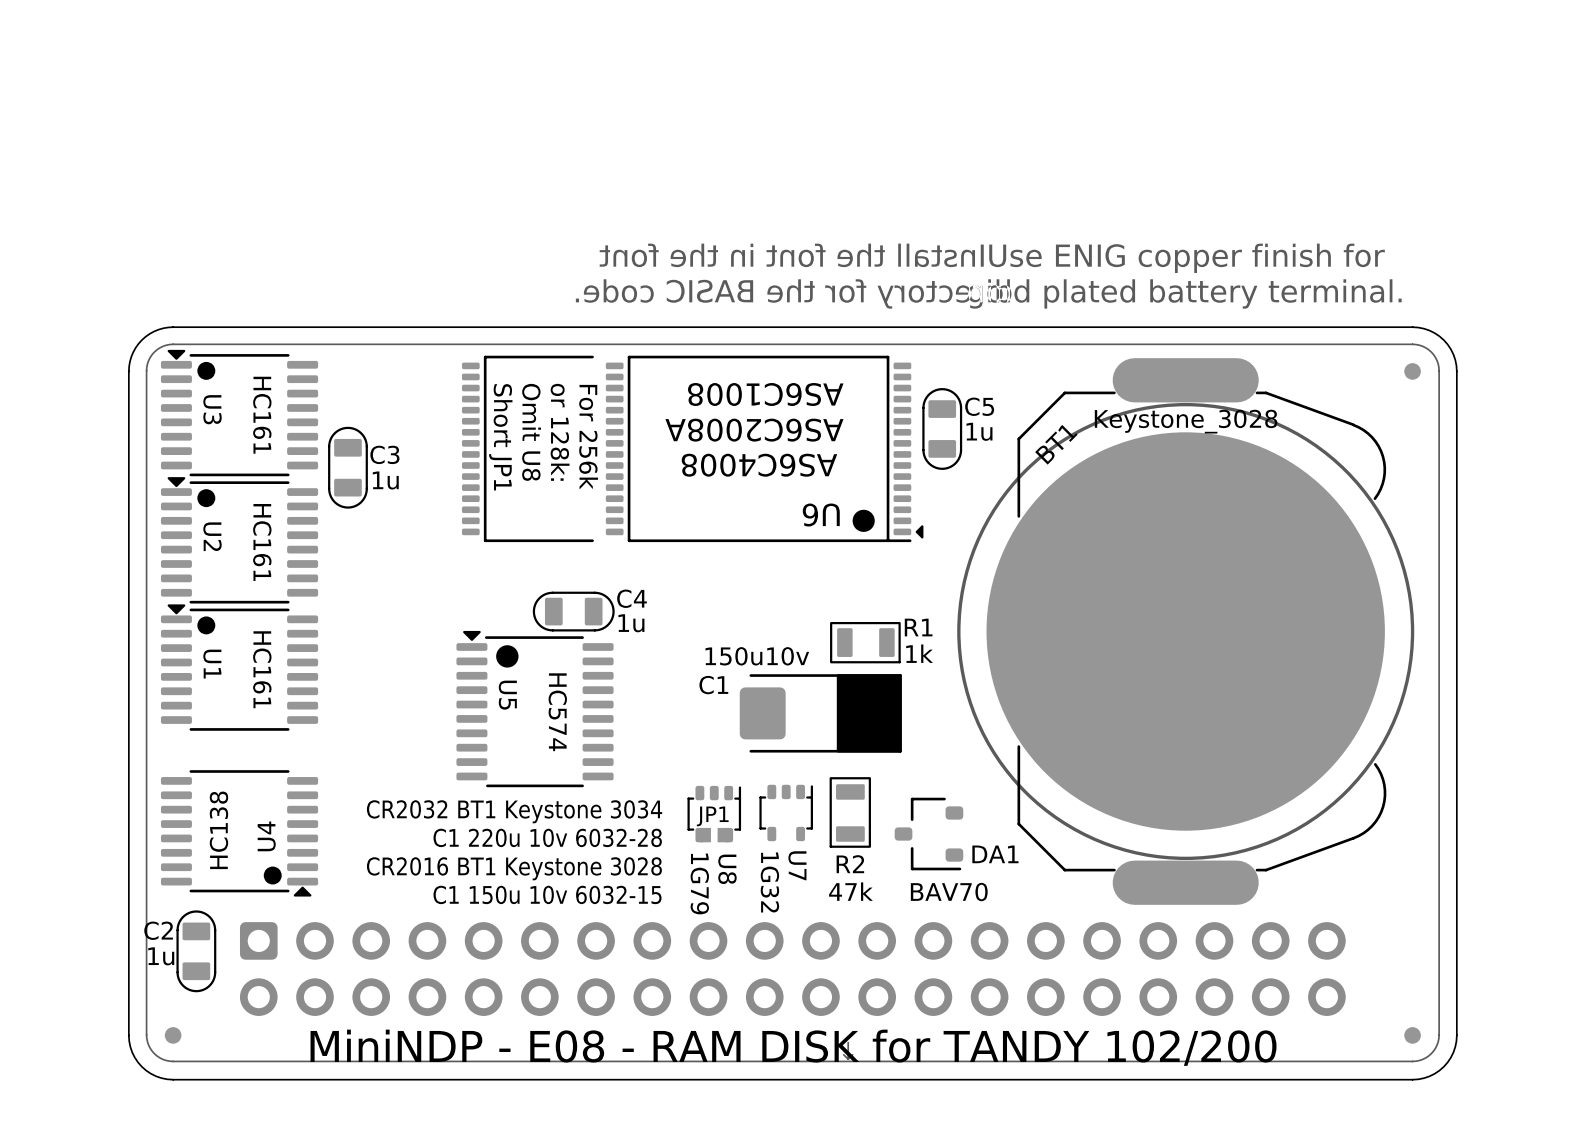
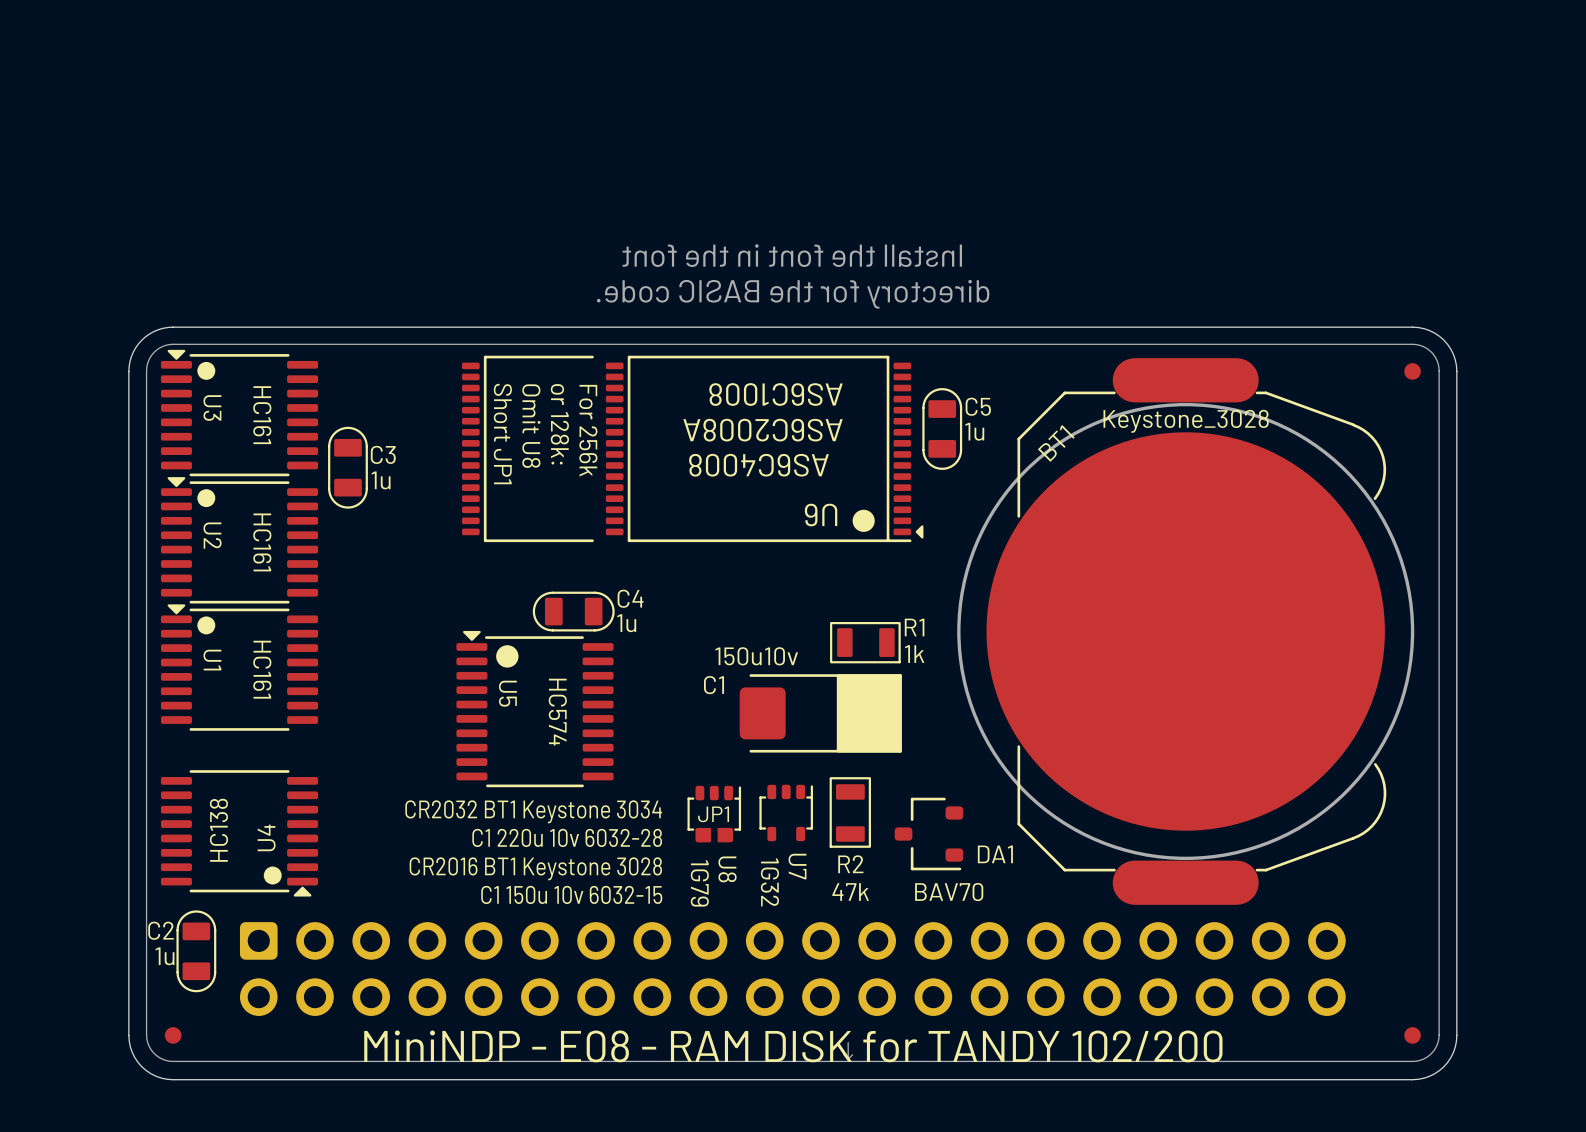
text: Use ENIG copper finish for (1187, 258) -> none
text: gold plated battery terminal. (1184, 293) -> none

